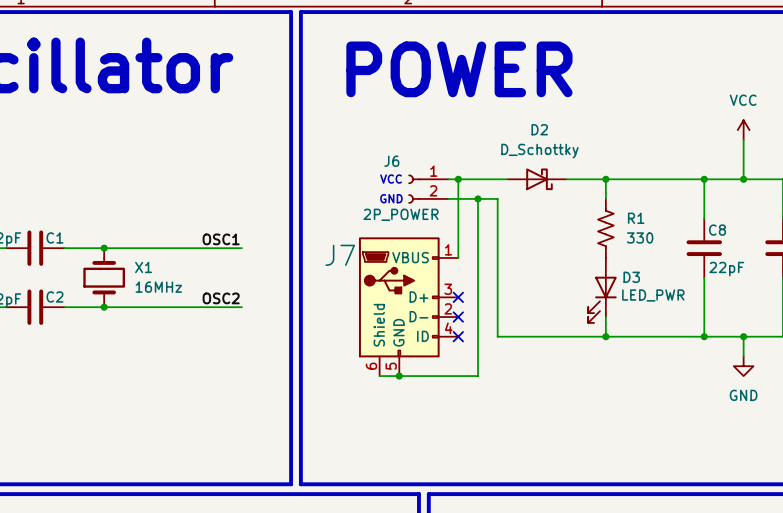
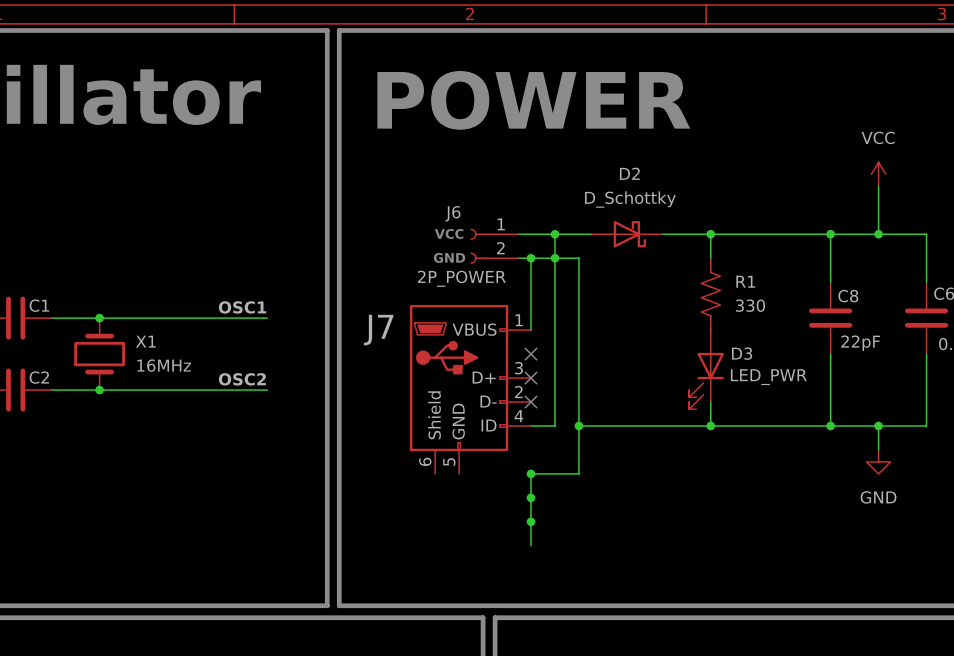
wire: (458, 179) (458, 198) -> (554, 234) (554, 258)
junction: (458, 179) -> none
junction: none -> (554, 234)
junction: none -> (531, 258)
no-connect mark: none -> (531, 354)
wire: none -> (531, 425) (554, 425)
no-connect mark: (458, 336) -> none
wire: (478, 336) (478, 376) -> (578, 425) (578, 473) (554, 473)
junction: none -> (578, 425)
wire: (379, 376) (458, 376) -> (531, 545) (531, 473)
junction: (399, 376) -> none
junction: none -> (531, 473)
junction: none -> (531, 497)
junction: none -> (531, 521)

